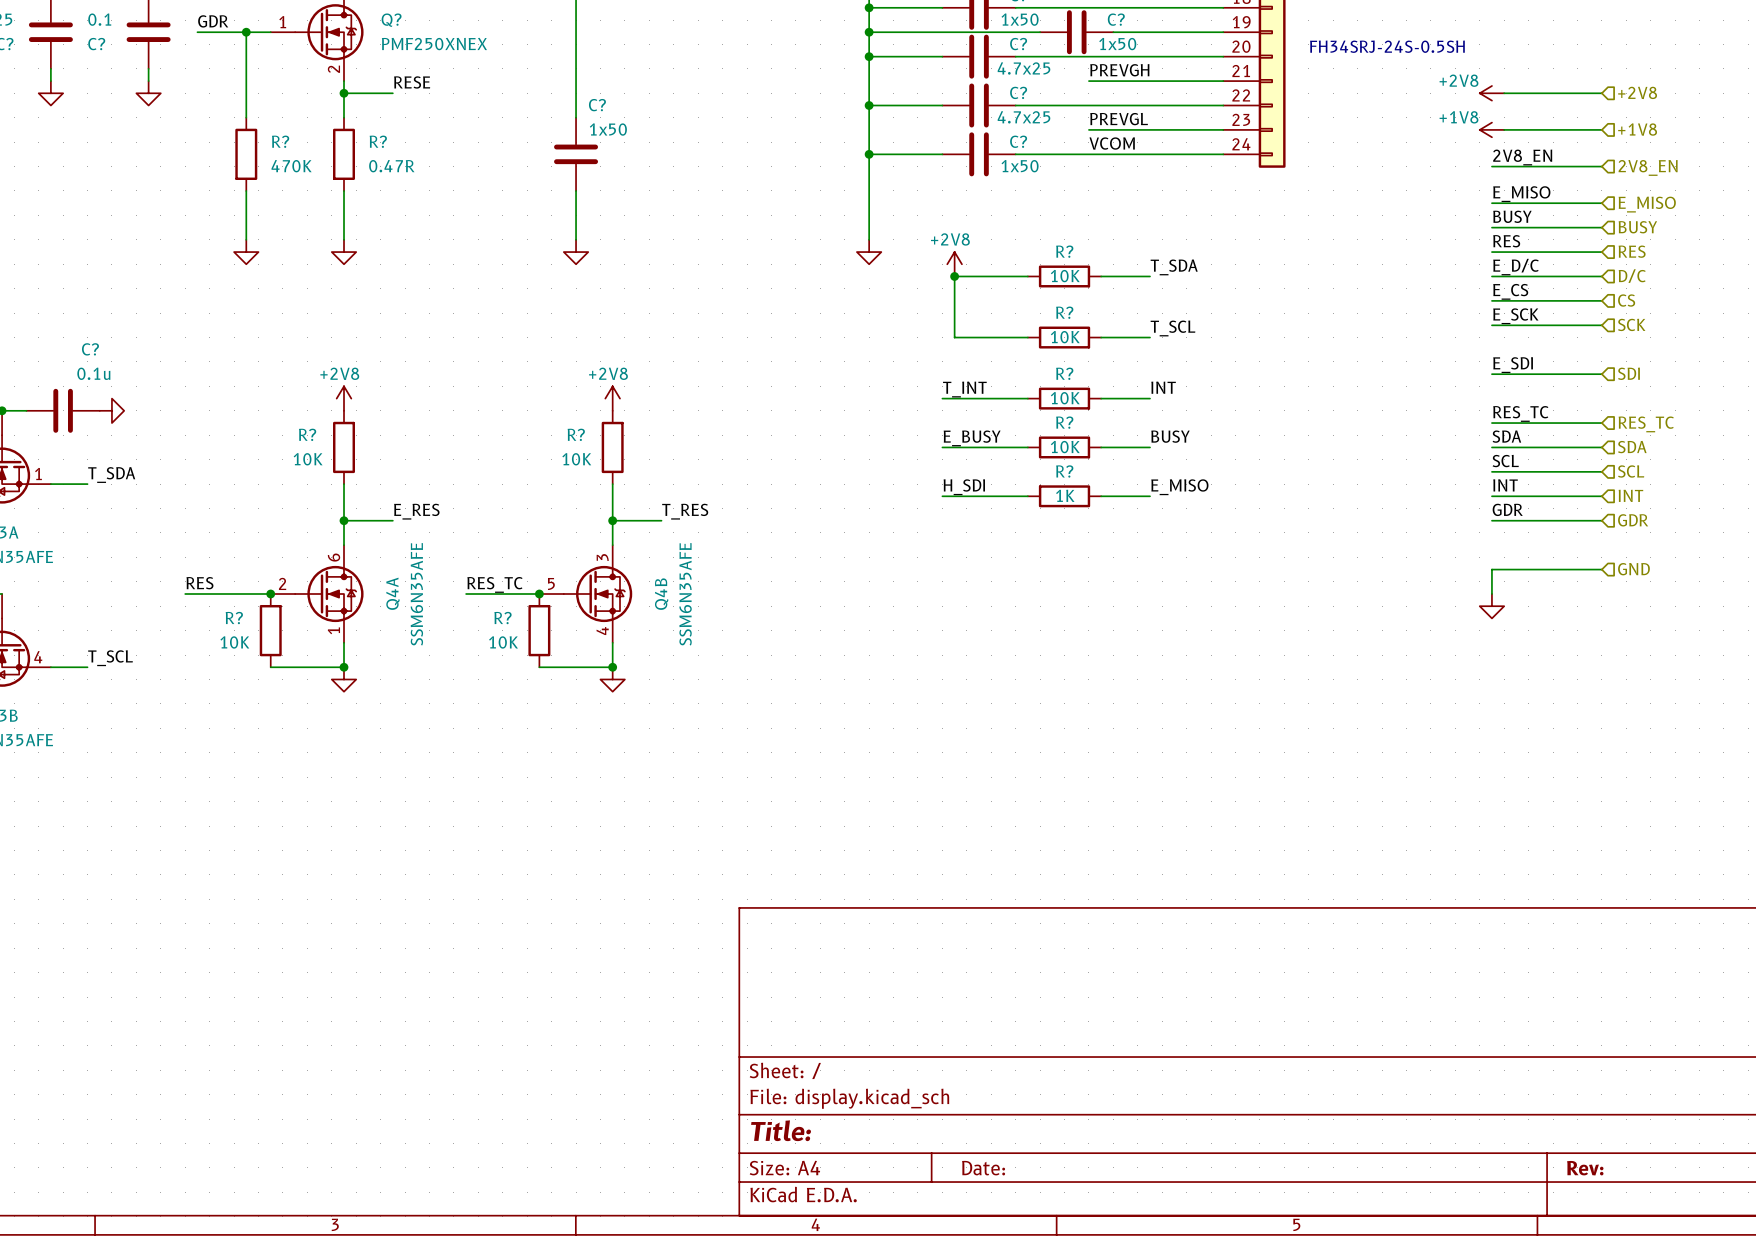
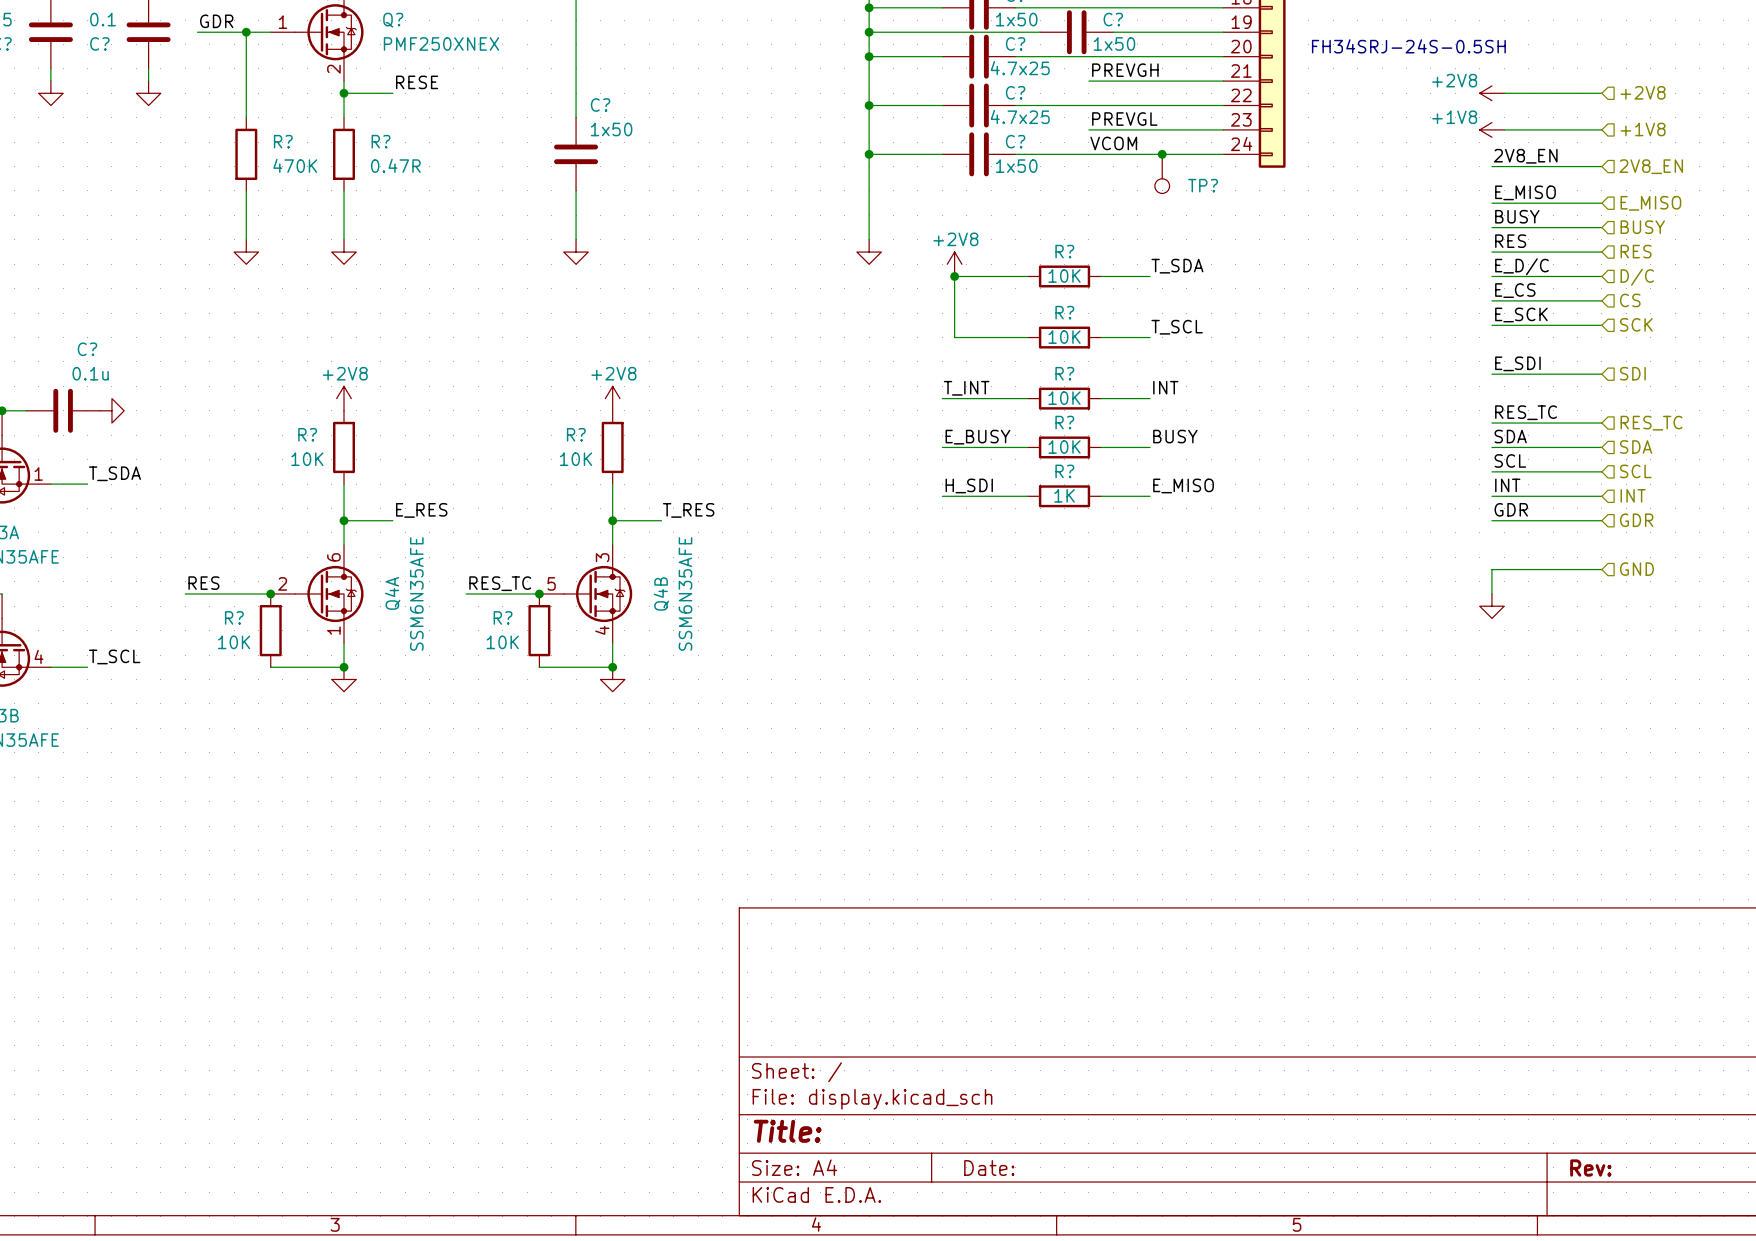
junction: none -> (1162, 154)
TP?: none -> (1162, 173)

